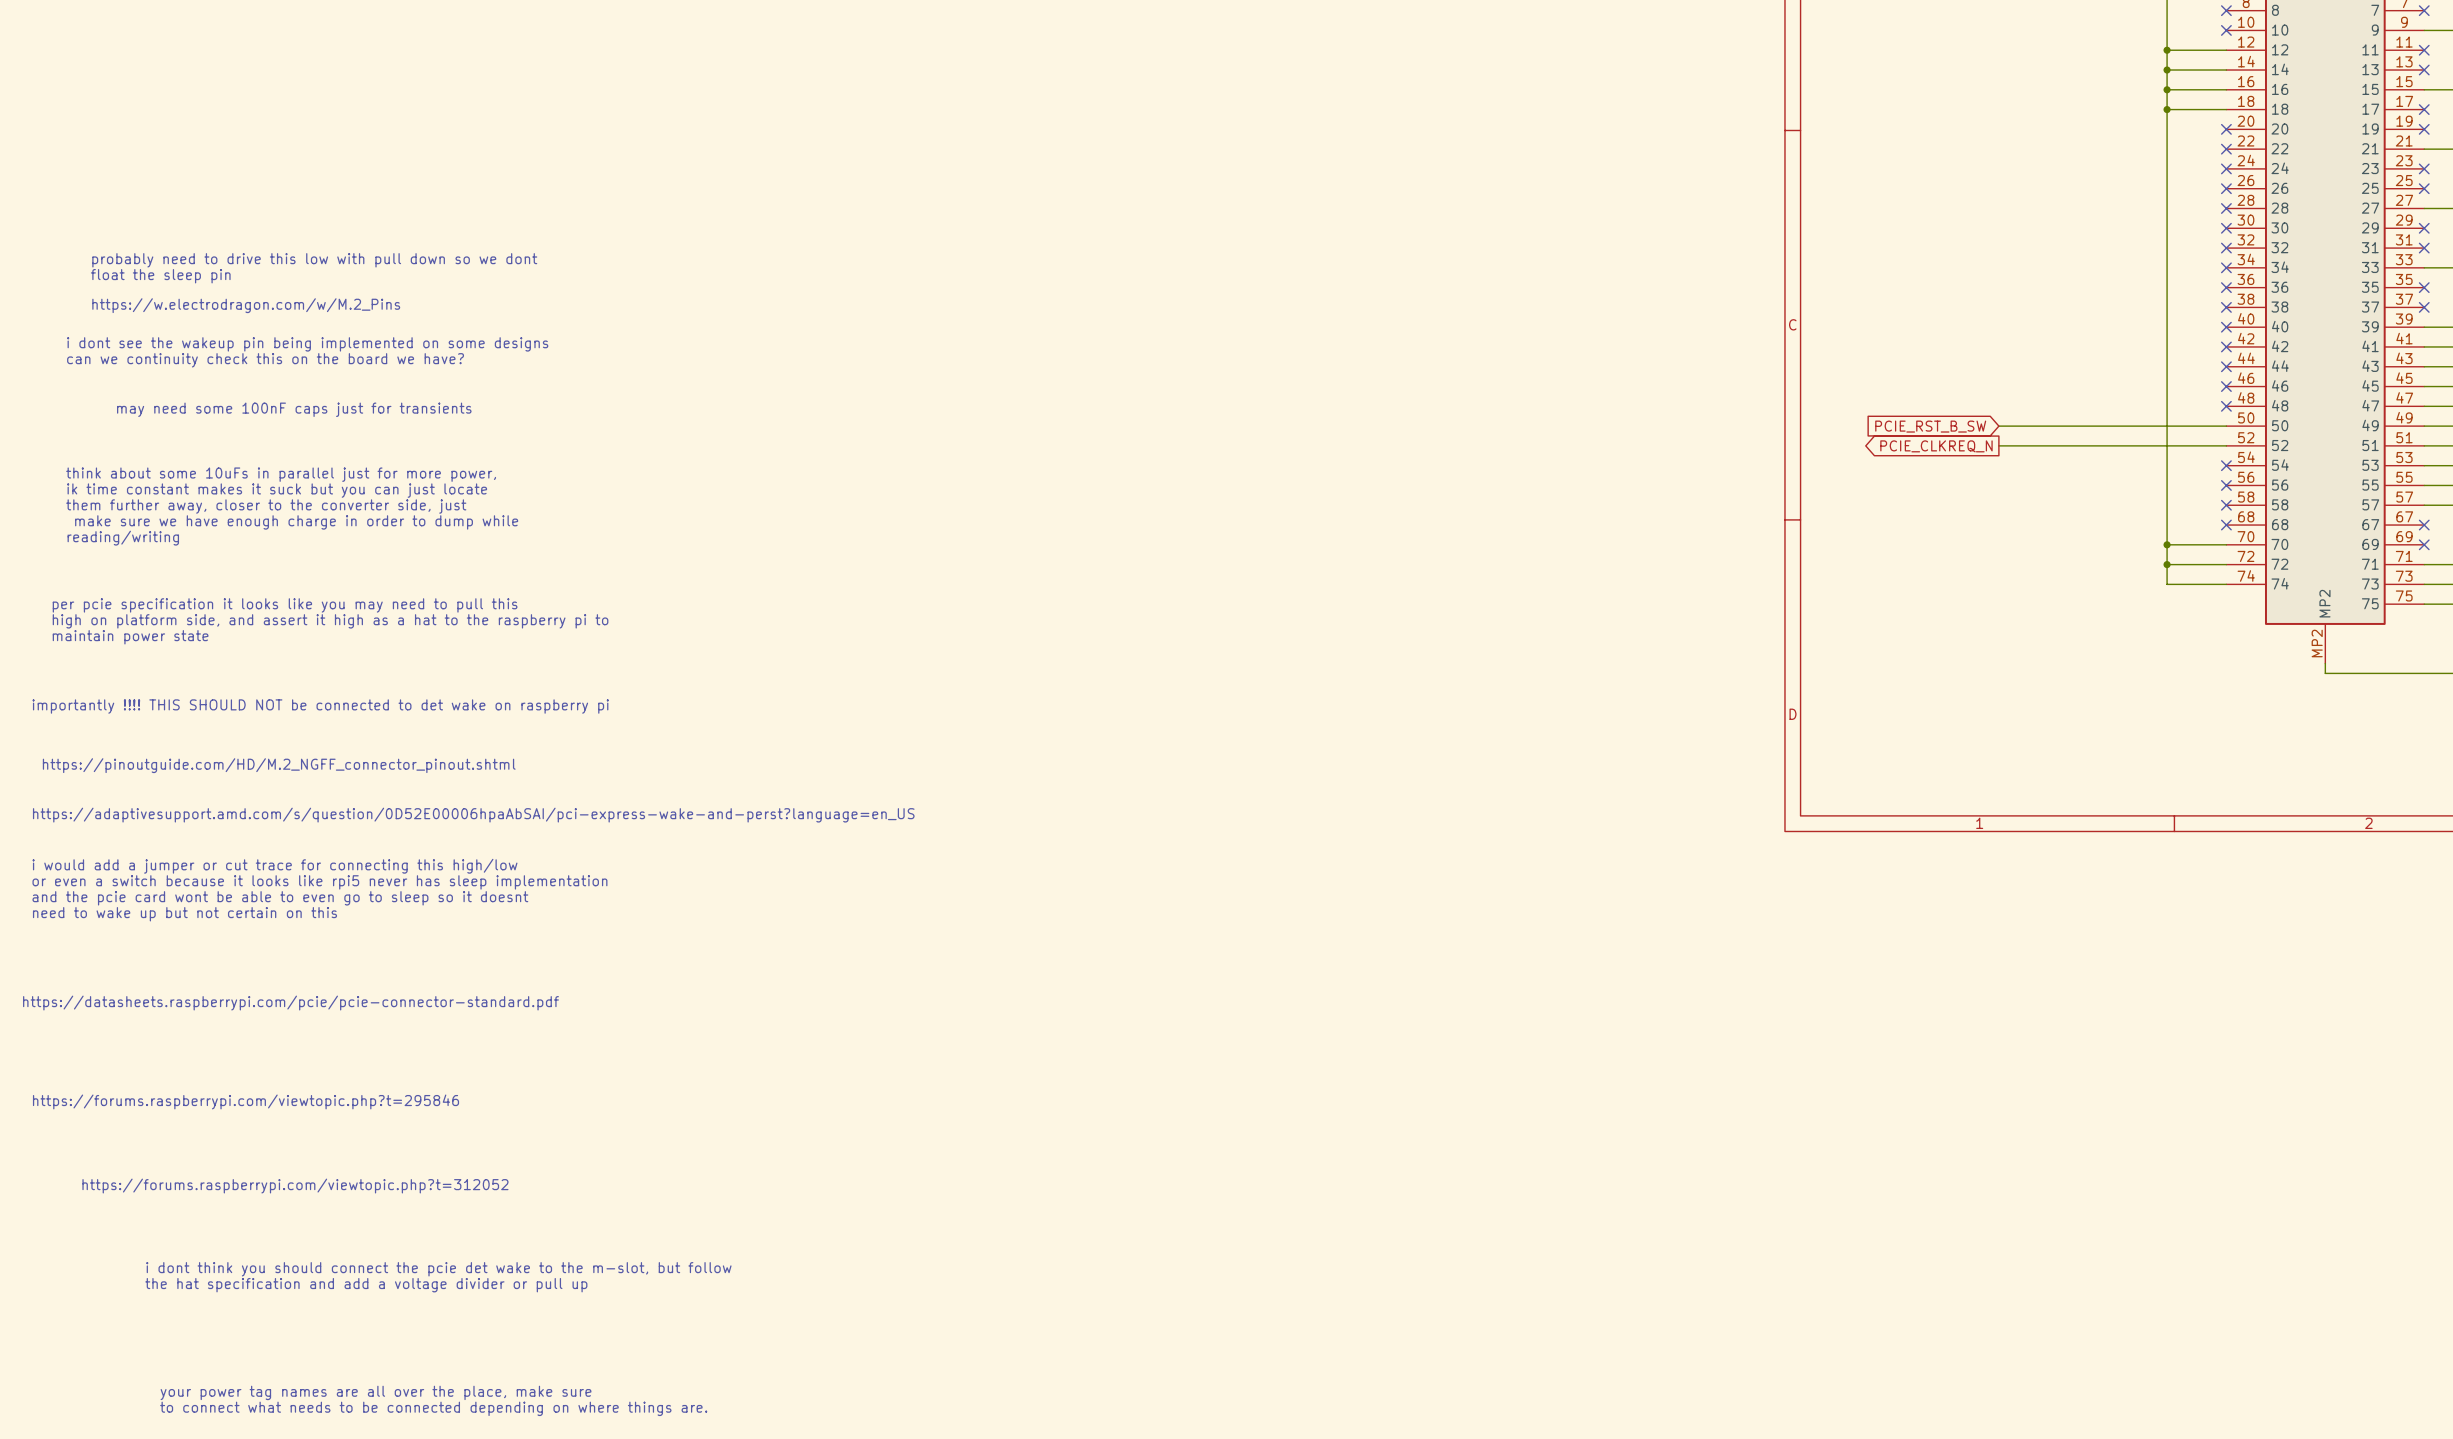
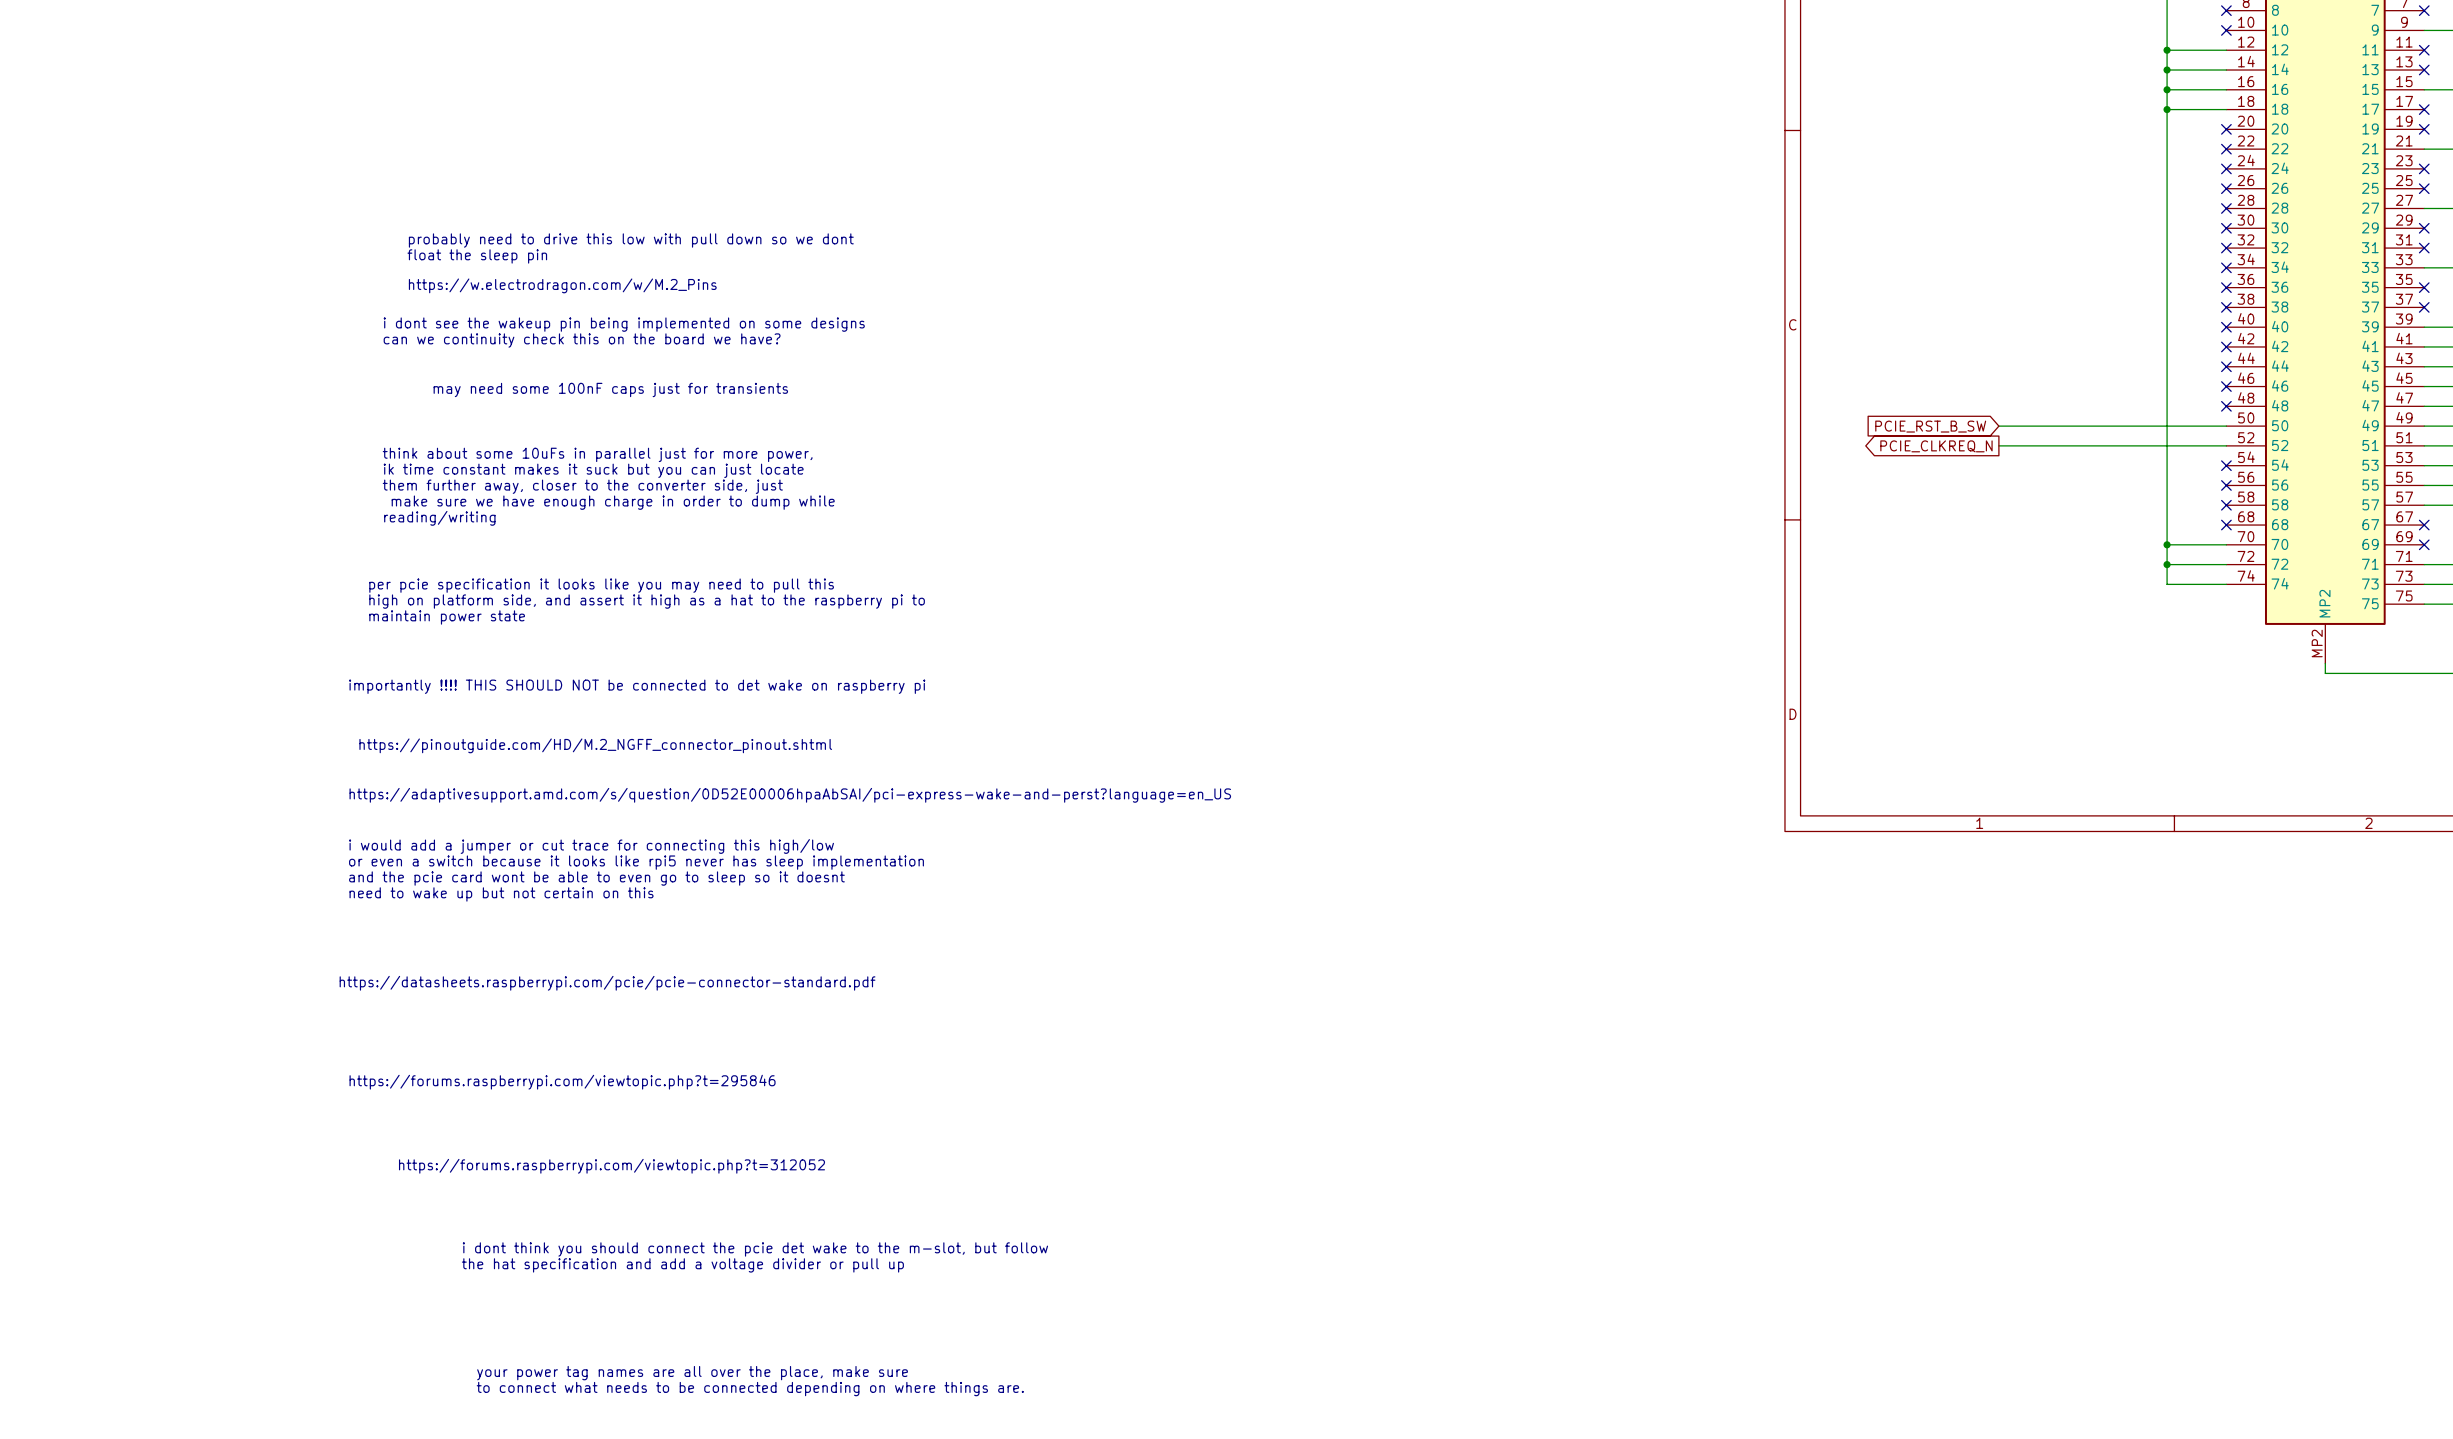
text: none -> probably need to drive this low with pull down so we dont (631, 240)
text: none -> float the sleep pin (477, 256)
text: probably need to drive this low with pull down so we dont (314, 260) -> none
text: float the sleep pin (160, 276) -> none
text: none -> https://w.electrodragon.com/w/M.2_Pins (562, 285)
text: https://w.electrodragon.com/w/M.2_Pins (246, 305) -> none
text: none -> i dont see the wakeup pin being implemented on some designs (624, 324)
text: none -> can we continuity check this on the board we have? (582, 340)
text: i dont see the wakeup pin being implemented on some designs (307, 344) -> none
text: can we continuity check this on the board we have? (265, 360) -> none
text: none -> may need some 100nF caps just for transients (610, 389)
text: may need some 100nF caps just for transients (294, 409) -> none
text: none -> think about some 10uFs in parallel just for more power, (597, 454)
text: none -> ik time constant makes it suck but you can just locate (593, 470)
text: think about some 10uFs in parallel just for more power, (281, 474) -> none
text: none -> them further away, closer to the converter side, just (582, 486)
text: ik time constant makes it suck but you can just locate (277, 490) -> none
text: none -> make sure we have enough charge in order to dump while (613, 502)
text: them further away, closer to the converter side, just (266, 506) -> none
text: none -> reading/writing (439, 518)
text: make sure we have enough charge in order to dump while (296, 522) -> none
text: reading/writing (123, 538) -> none
text: none -> per pcie specification it looks like you may need to pull this (601, 585)
text: none -> high on platform side, and assert it high as a hat to the raspberry pi to (647, 601)
text: per pcie specification it looks like you may need to pull this (285, 605) -> none
text: none -> maintain power state (447, 617)
text: high on platform side, and assert it high as a hat to the raspberry pi to (330, 621) -> none
text: maintain power state (130, 637) -> none
text: none -> importantly !!!! THIS SHOULD NOT be connected to det wake on raspberry pi (637, 686)
text: importantly !!!! THIS SHOULD NOT be connected to det wake on raspberry pi (320, 706) -> none
text: none -> https://pinoutguide.com/HD/M.2_NGFF_connector_pinout.shtml (595, 745)
text: https://pinoutguide.com/HD/M.2_NGFF_connector_pinout.shtml (279, 765) -> none
text: none -> https://adaptivesupport.amd.com/s/question/0D52E00006hpaAbSAI/pci-express-wake-and-perst?language=en_US (790, 795)
text: https://adaptivesupport.amd.com/s/question/0D52E00006hpaAbSAI/pci-express-wake-and-perst?language=en_US (473, 815) -> none
text: none -> i would add a jumper or cut trace for connecting this high/low (591, 846)
text: none -> or even a switch because it looks like rpi5 never has sleep implementation (636, 862)
text: i would add a jumper or cut trace for connecting this high/low (274, 866) -> none
text: none -> and the pcie card wont be able to even go to sleep so it doesnt (596, 878)
text: or even a switch because it looks like rpi5 never has sleep implementation (319, 882) -> none
text: none -> need to wake up but not certain on this (501, 894)
text: and the pcie card wont be able to even go to sleep so it doesnt (280, 898) -> none
text: need to wake up but not certain on this (185, 914) -> none
text: none -> https://datasheets.raspberrypi.com/pcie/pcie-connector-standard.pdf (607, 983)
text: https://datasheets.raspberrypi.com/pcie/pcie-connector-standard.pdf (290, 1003) -> none
text: none -> https://forums.raspberrypi.com/viewtopic.php?t=295846 (562, 1082)
text: https://forums.raspberrypi.com/viewtopic.php?t=295846 (246, 1101) -> none
text: none -> https://forums.raspberrypi.com/viewtopic.php?t=312052 (612, 1166)
text: https://forums.raspberrypi.com/viewtopic.php?t=312052 (295, 1186) -> none
text: none -> i dont think you should connect the pcie det wake to the m-slot, but follow (755, 1249)
text: none -> the hat specification and add a voltage divider or pull up (682, 1265)
text: i dont think you should connect the pcie det wake to the m-slot, but follow (438, 1269) -> none
text: the hat specification and add a voltage divider or pull up (366, 1285) -> none
text: none -> your power tag names are all over the place, make sure (692, 1373)
text: none -> to connect what needs to be connected depending on where things are. (750, 1389)
text: your power tag names are all over the place, make sure (376, 1392) -> none
text: to connect what needs to be connected depending on where things are. (433, 1408) -> none

